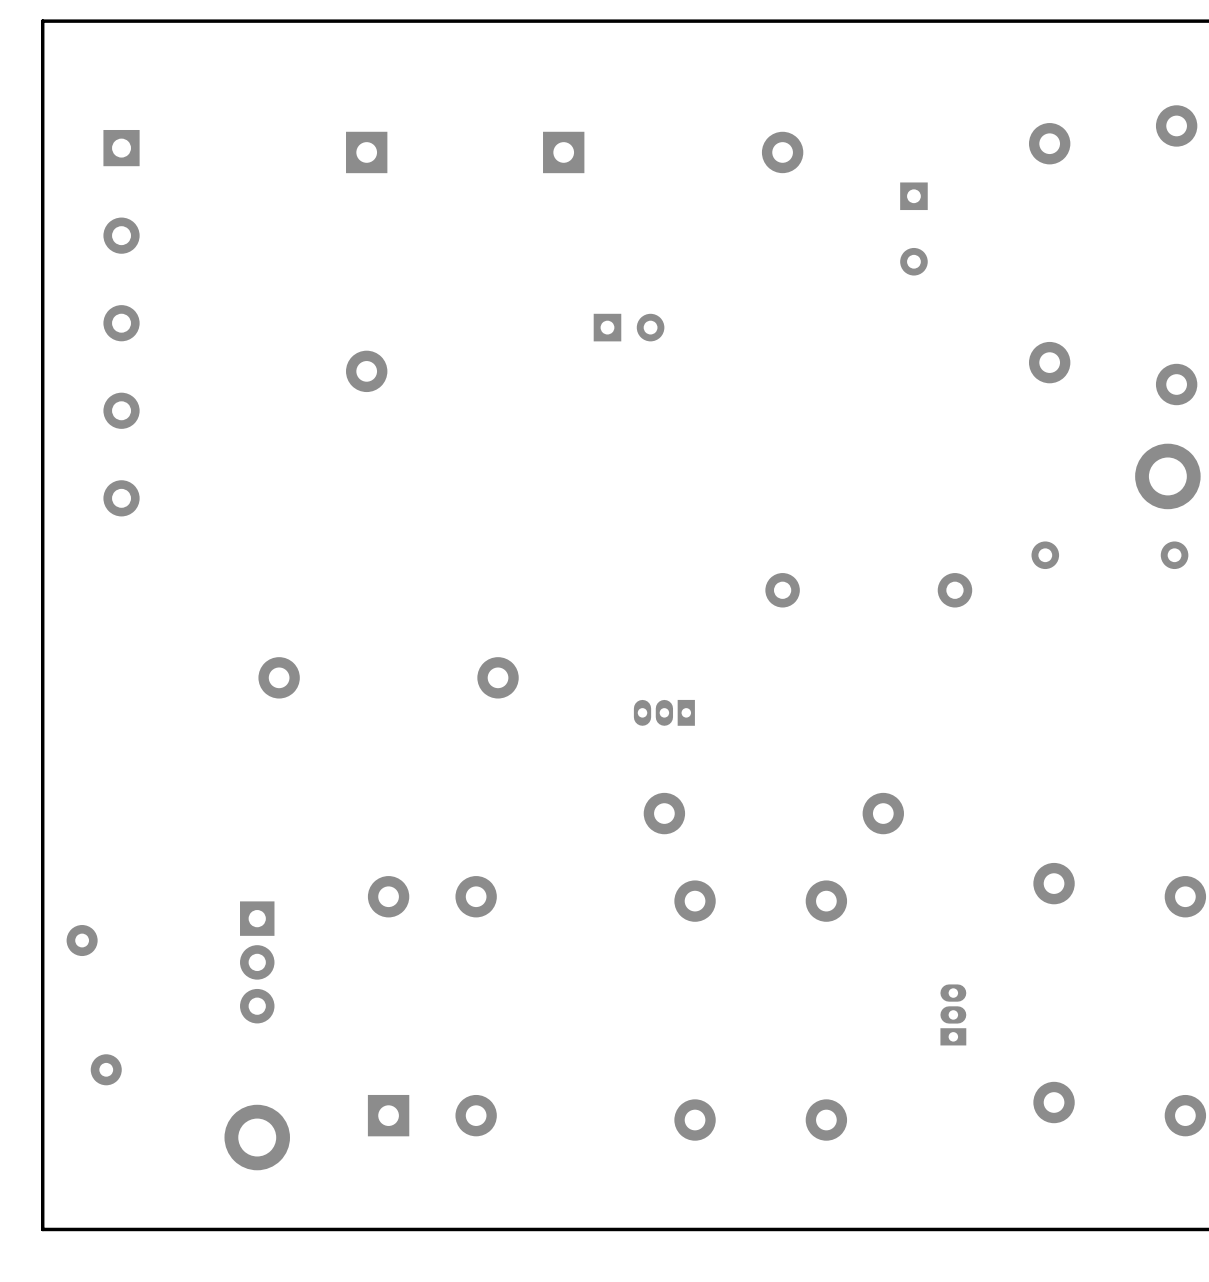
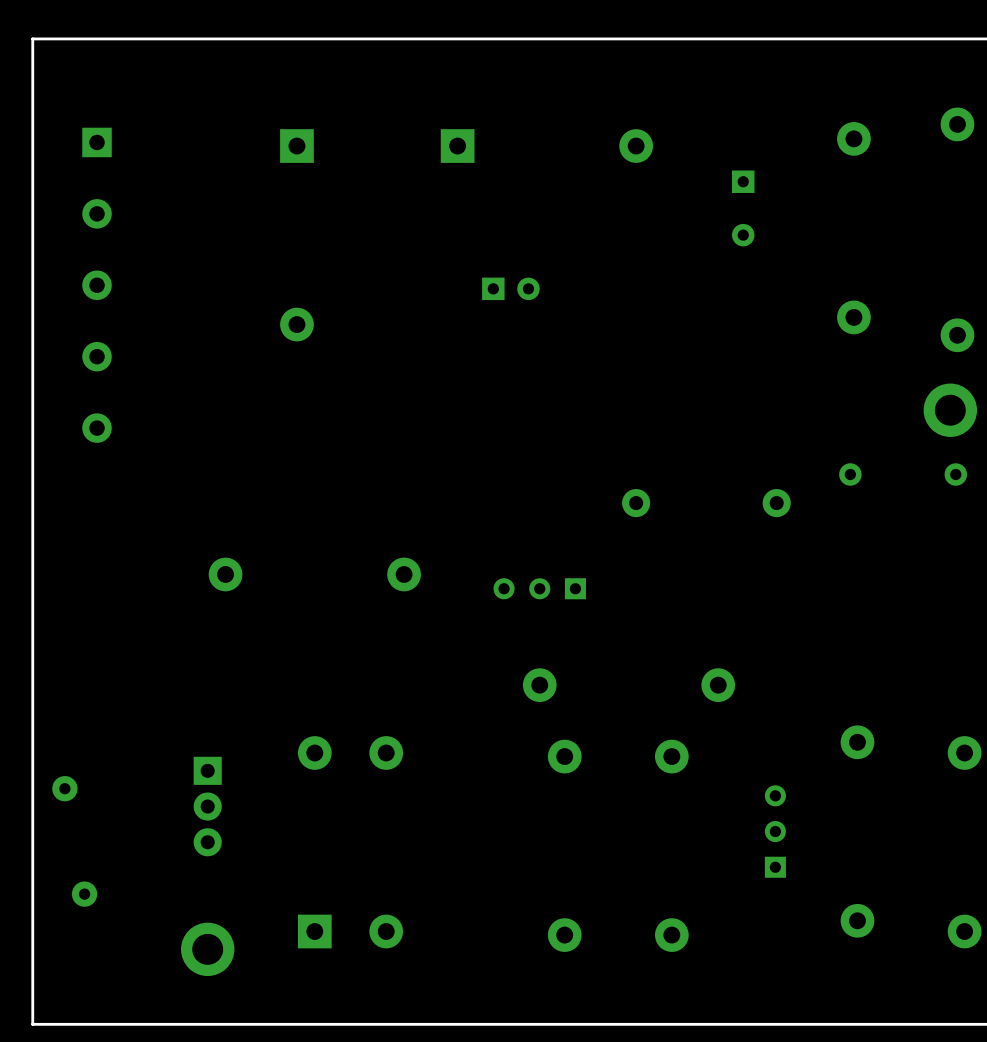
part: none -> (539, 588)
part: (664, 712) -> none
part: none -> (775, 831)
part: (953, 1014) -> none

